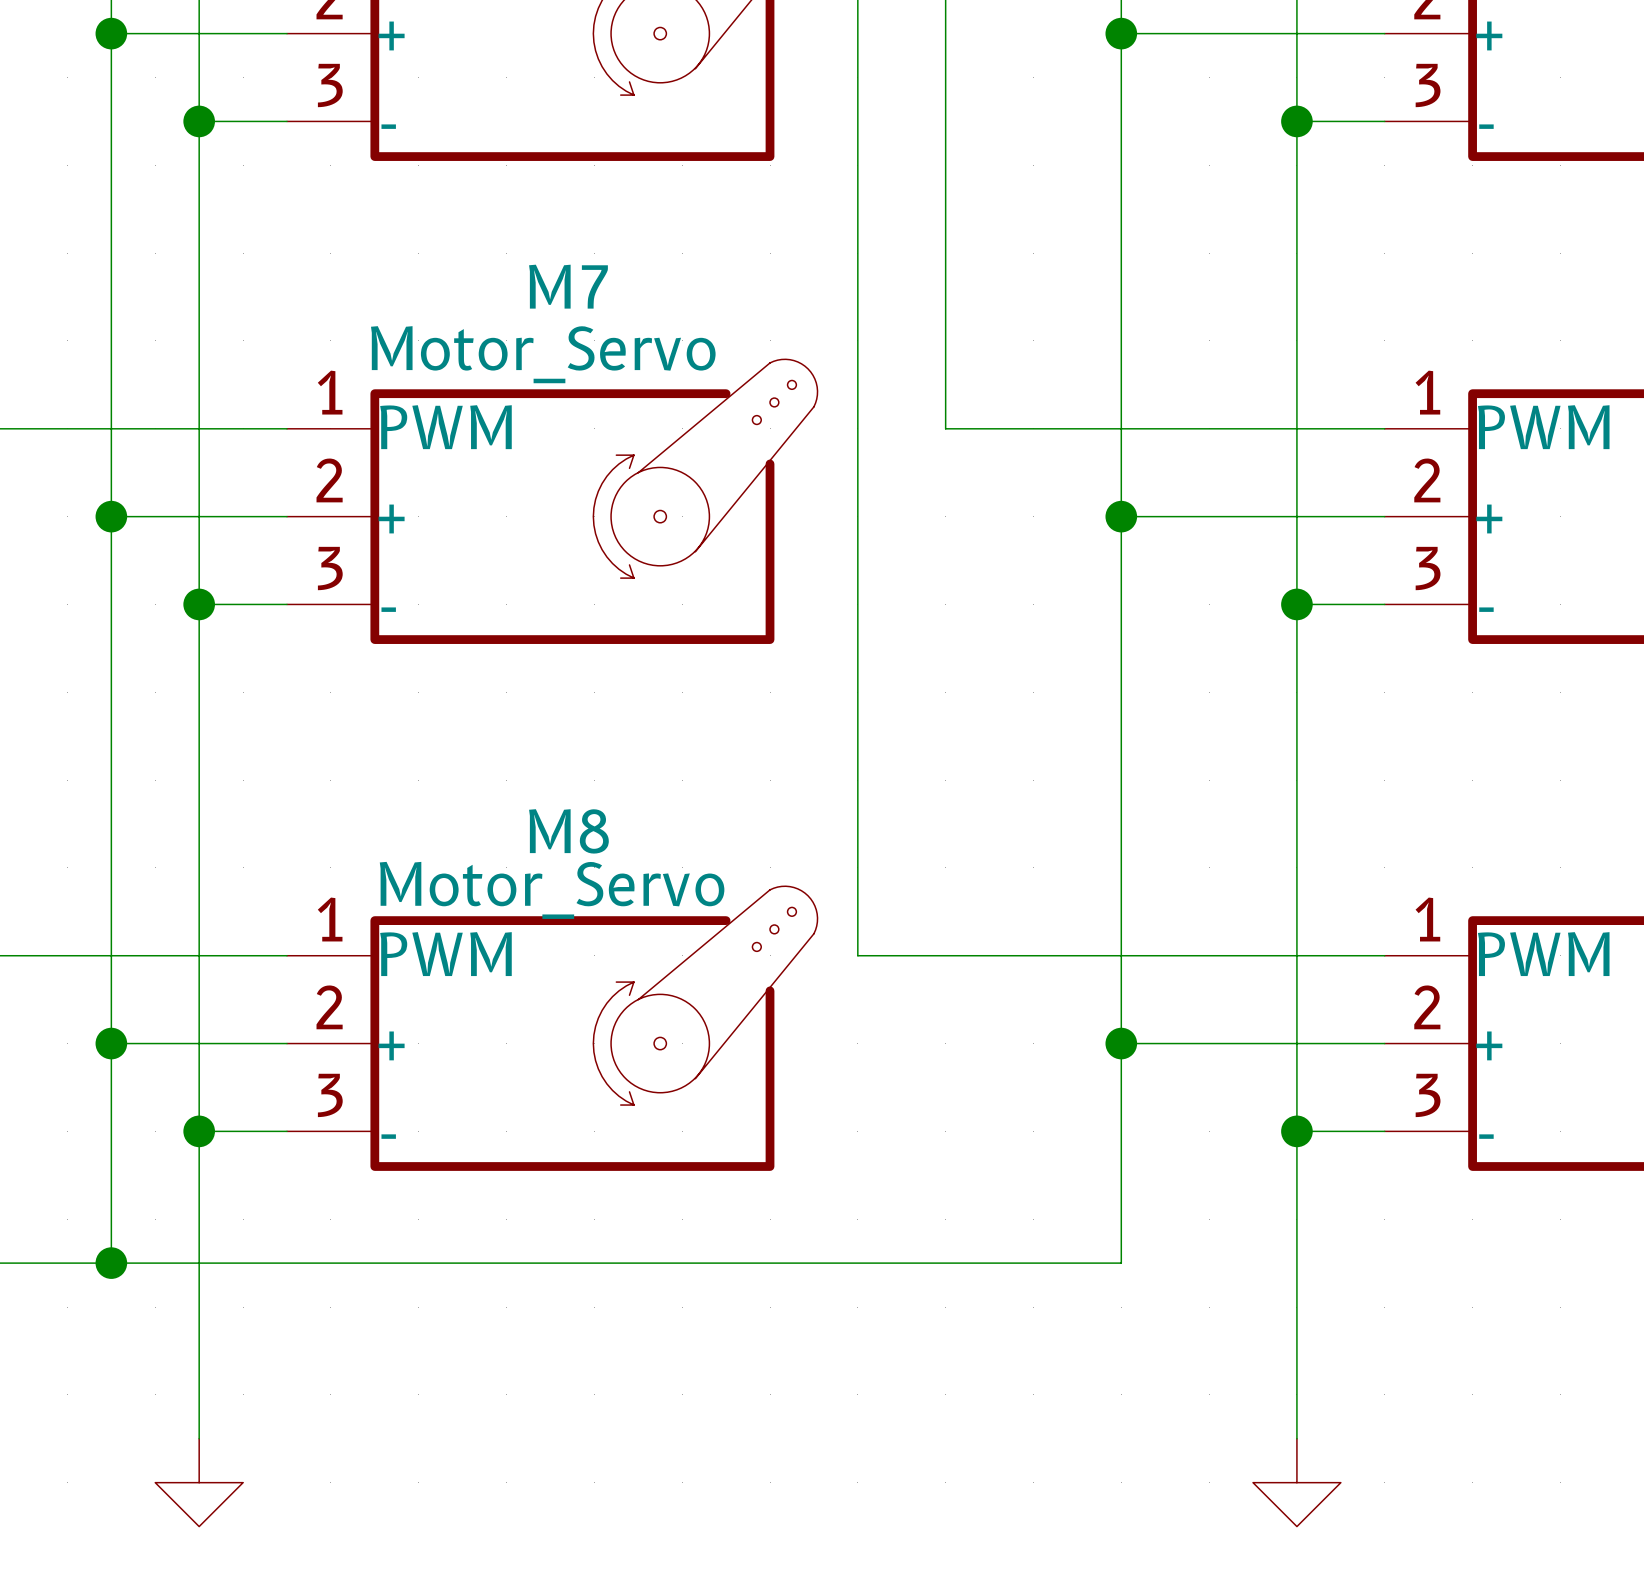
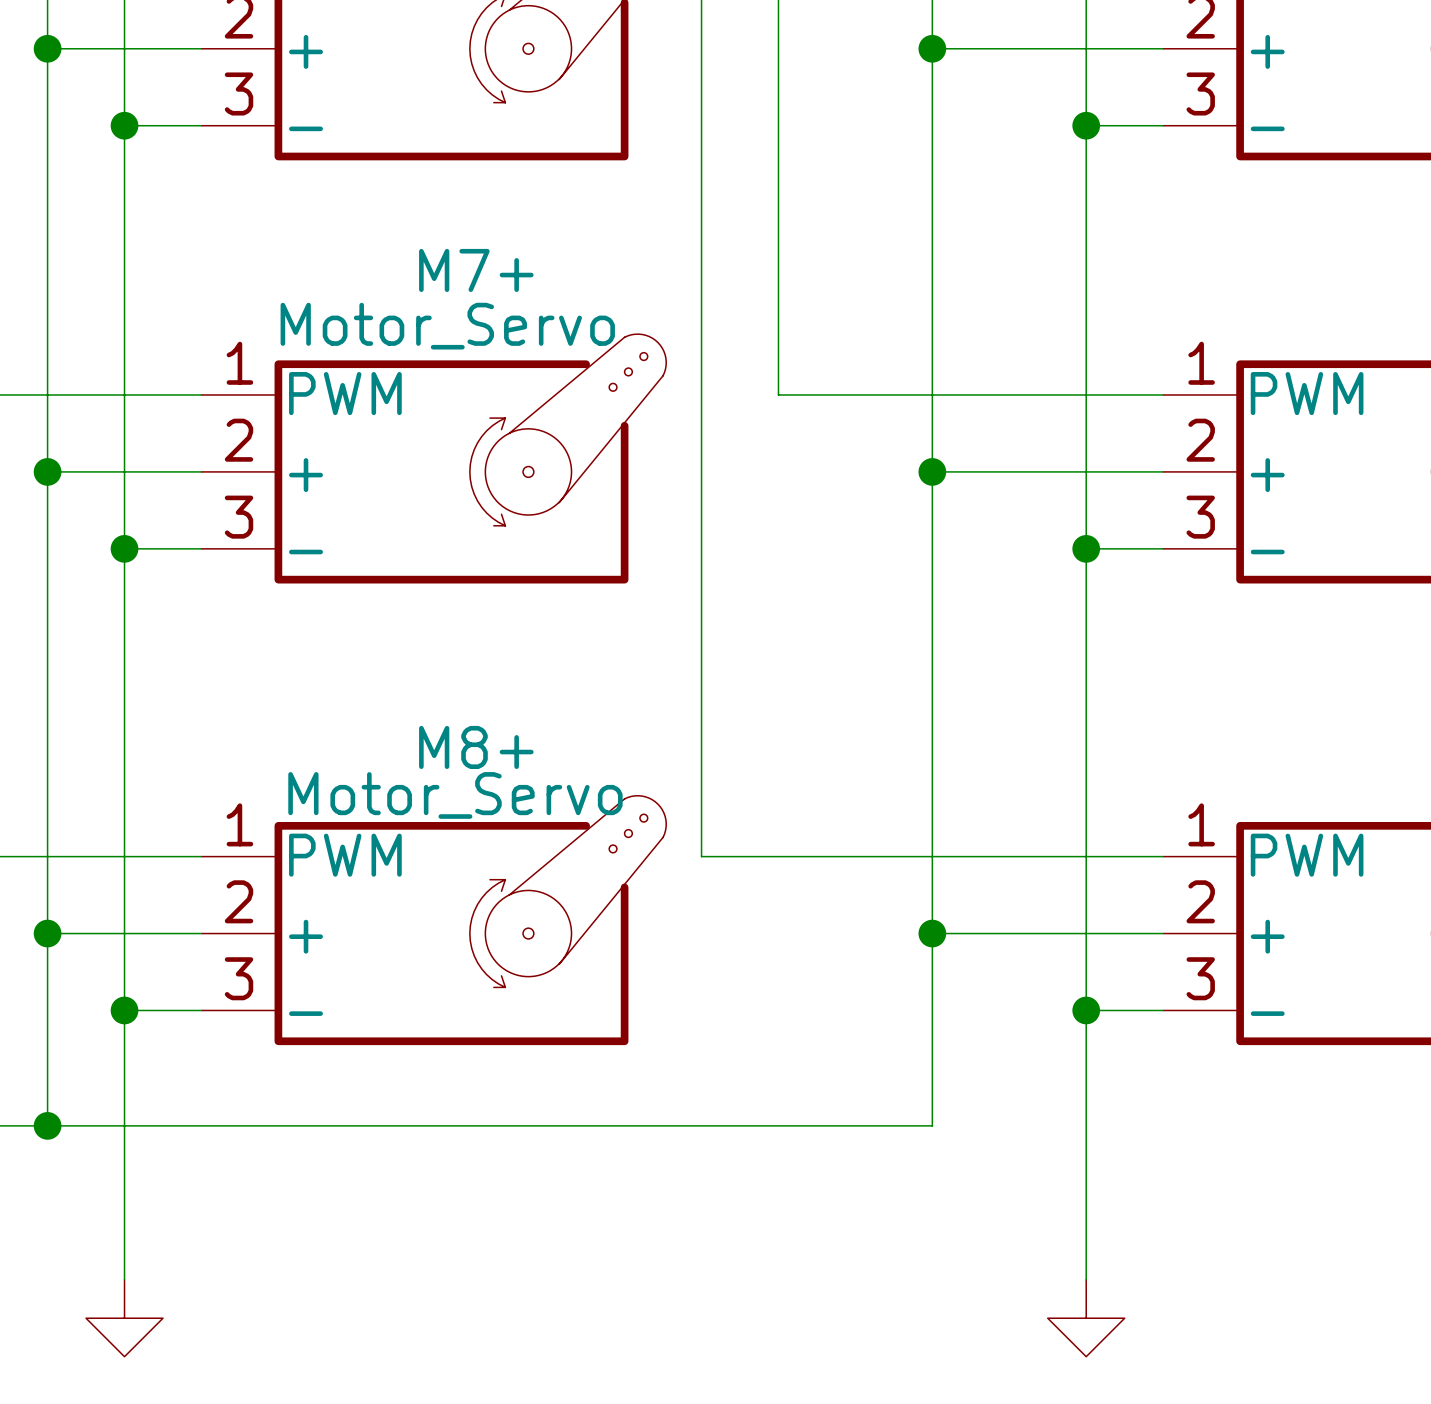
M7 name: M7 (568, 286) -> M7+ (476, 270)
M8 name: M8 (568, 831) -> M8+ (476, 747)

